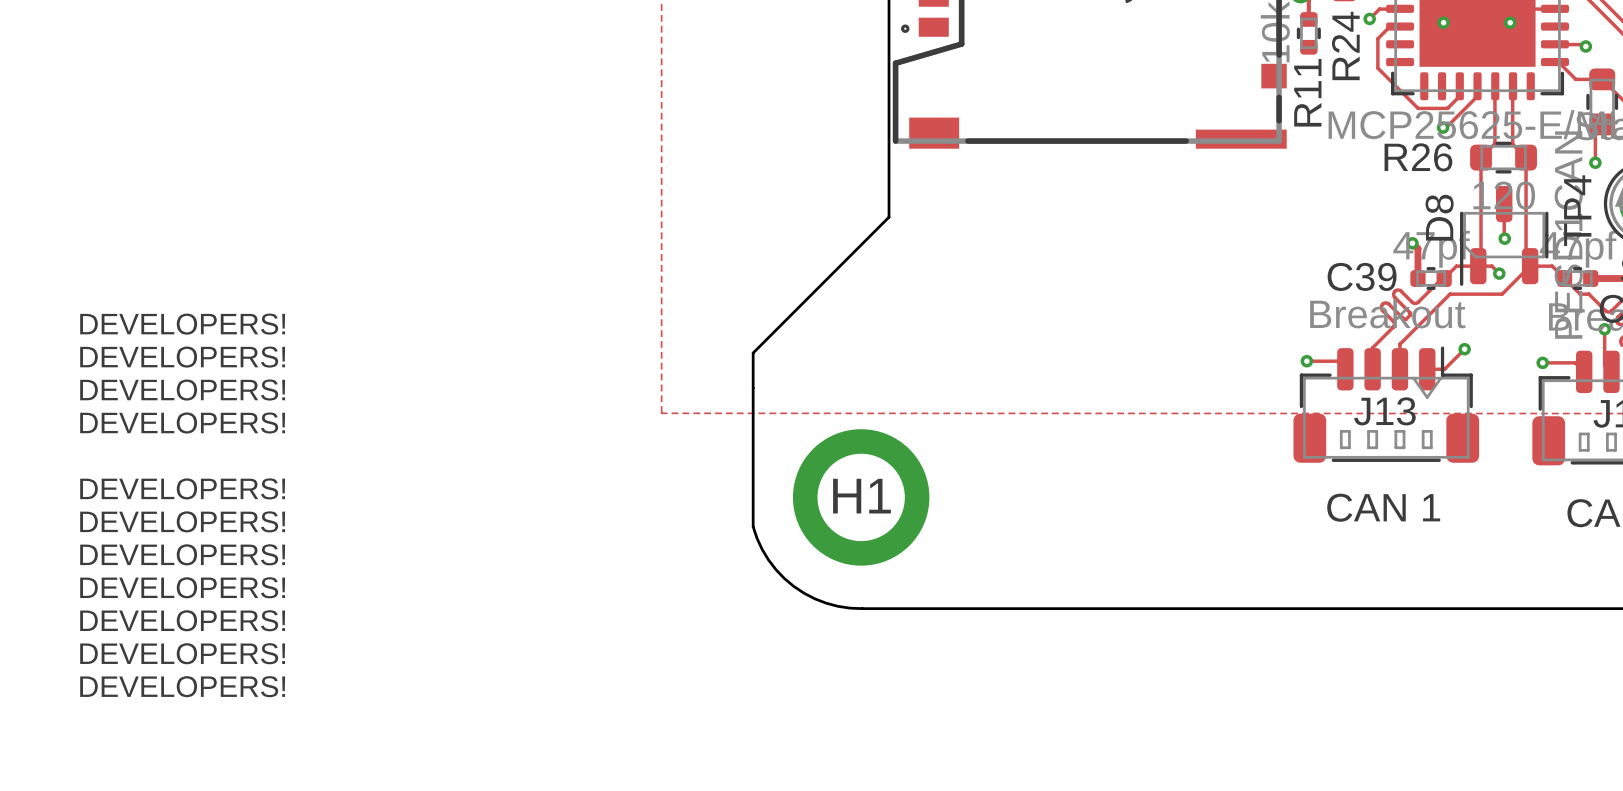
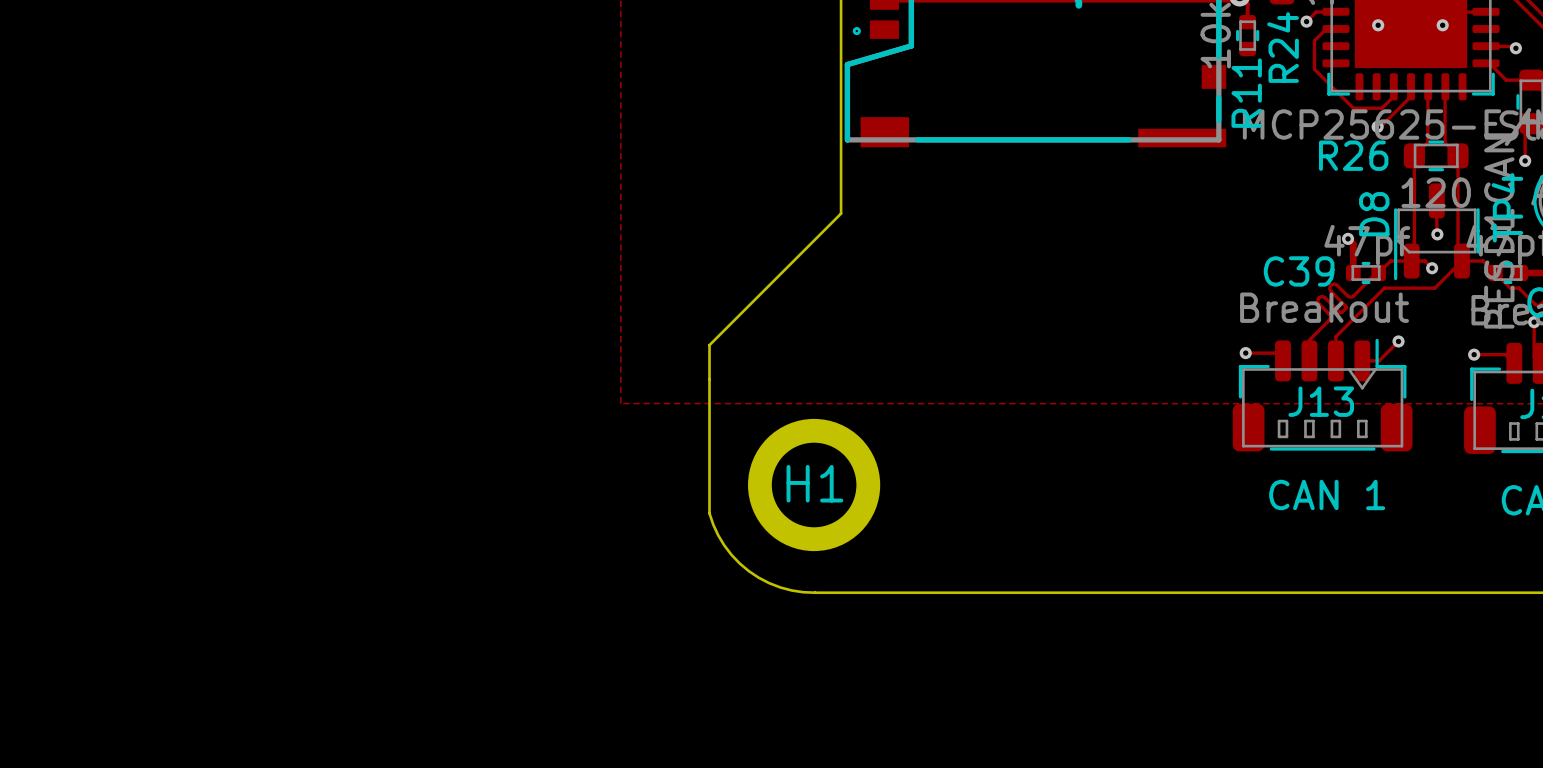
text: DEVELOPERS! (182, 324) -> none
text: DEVELOPERS! (182, 357) -> none
text: DEVELOPERS! (182, 390) -> none
text: DEVELOPERS! (182, 422) -> none
text: DEVELOPERS! (182, 488) -> none
text: DEVELOPERS! (182, 521) -> none
text: DEVELOPERS! (182, 554) -> none
text: DEVELOPERS! (182, 587) -> none
text: DEVELOPERS! (182, 620) -> none
text: DEVELOPERS! (182, 653) -> none
text: DEVELOPERS! (182, 686) -> none

